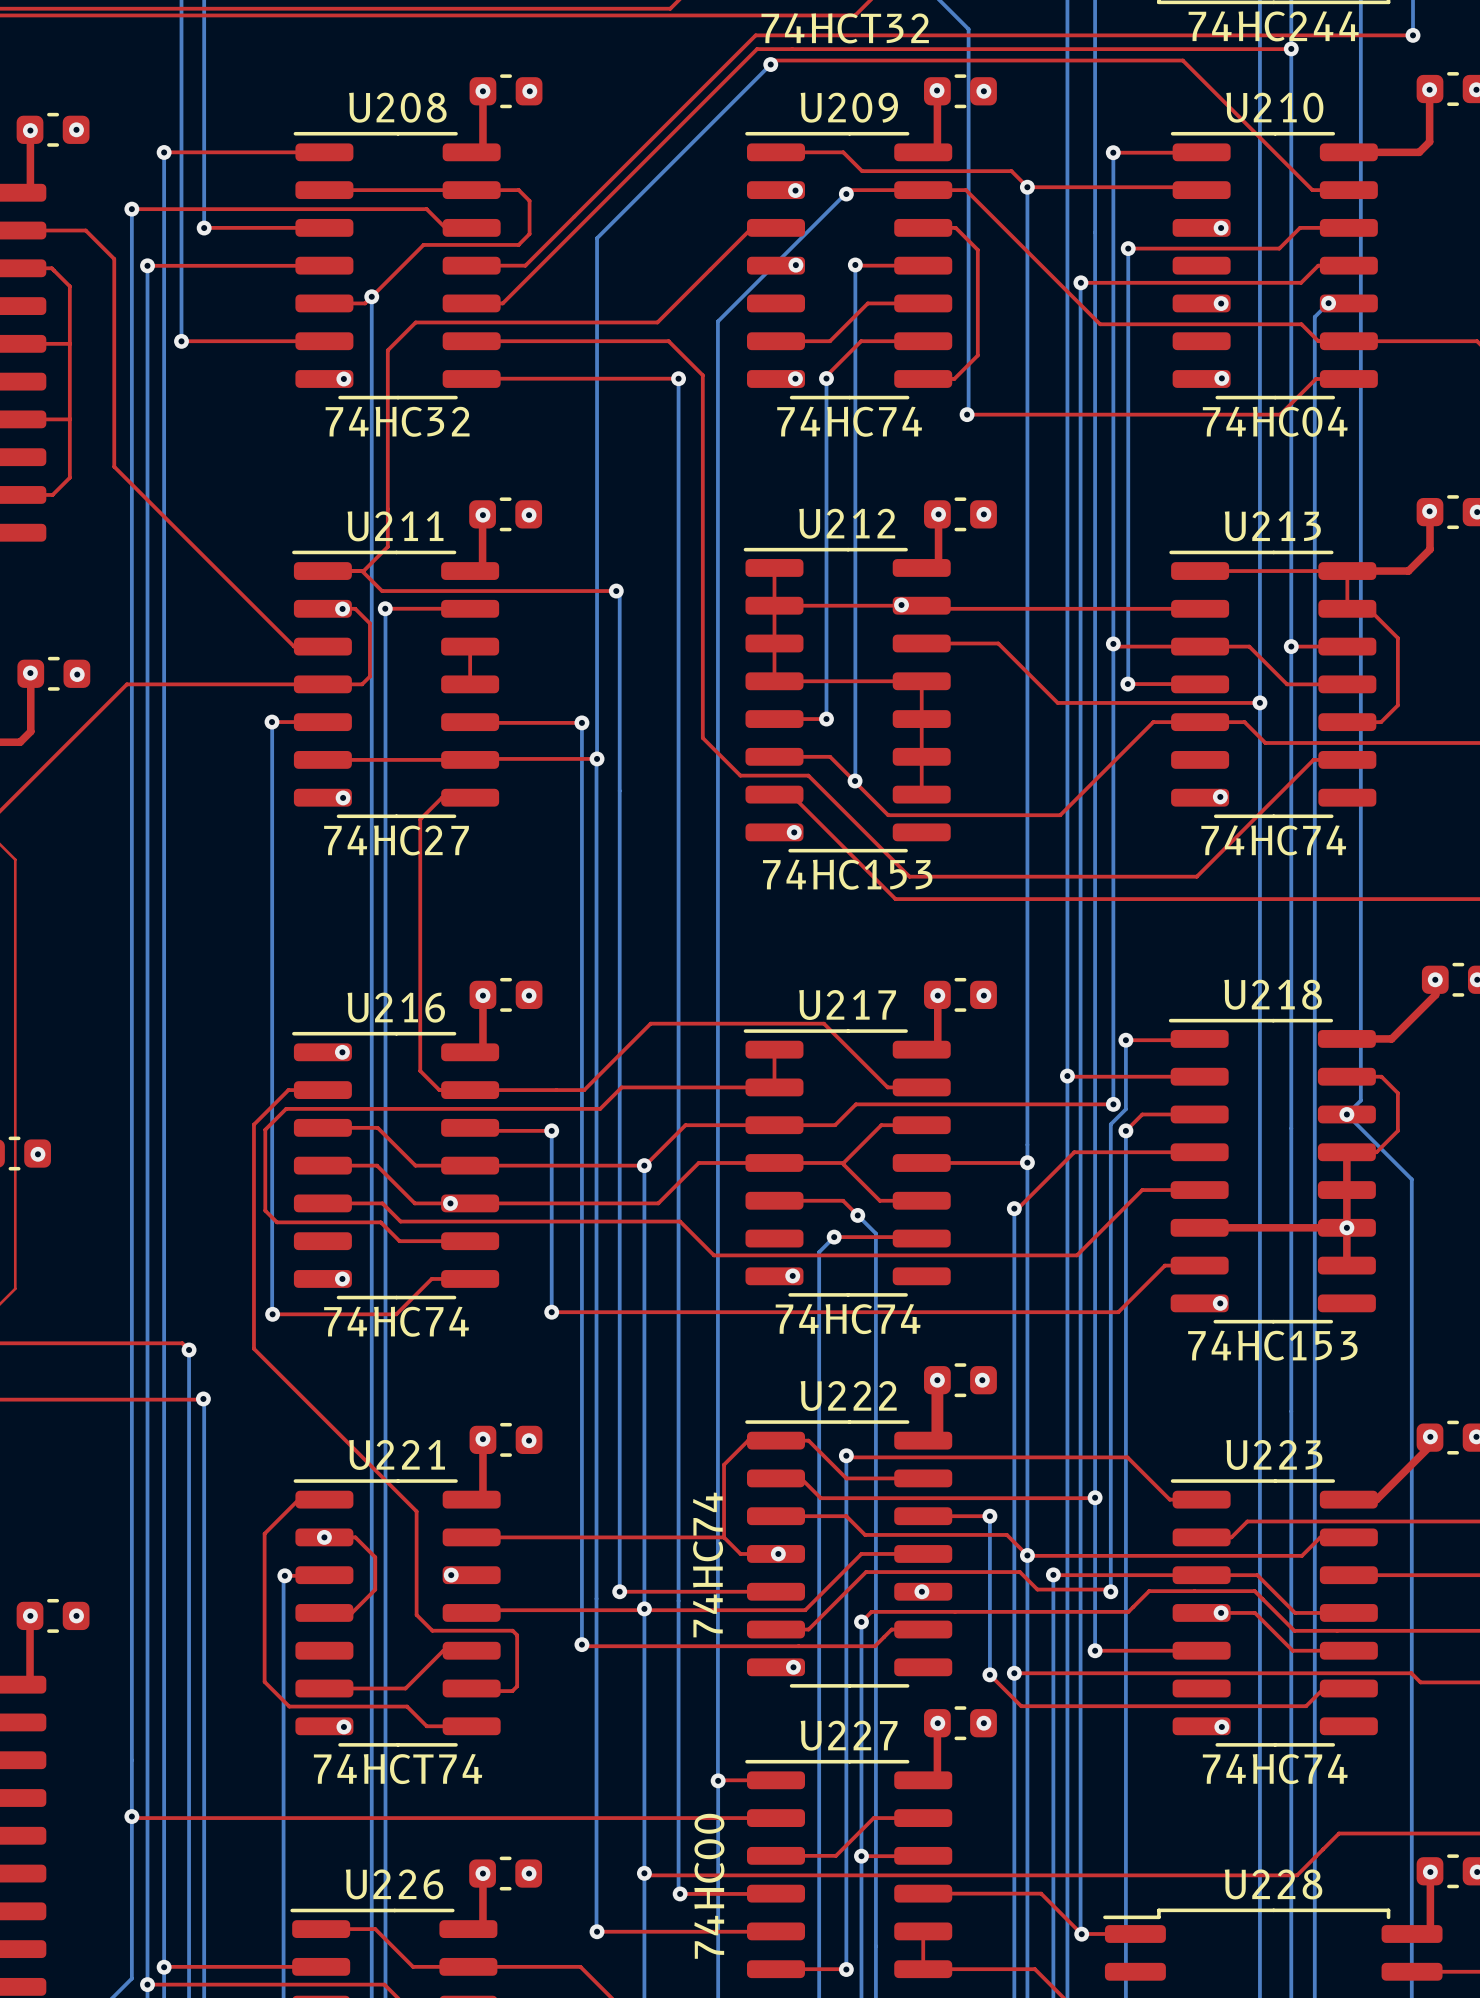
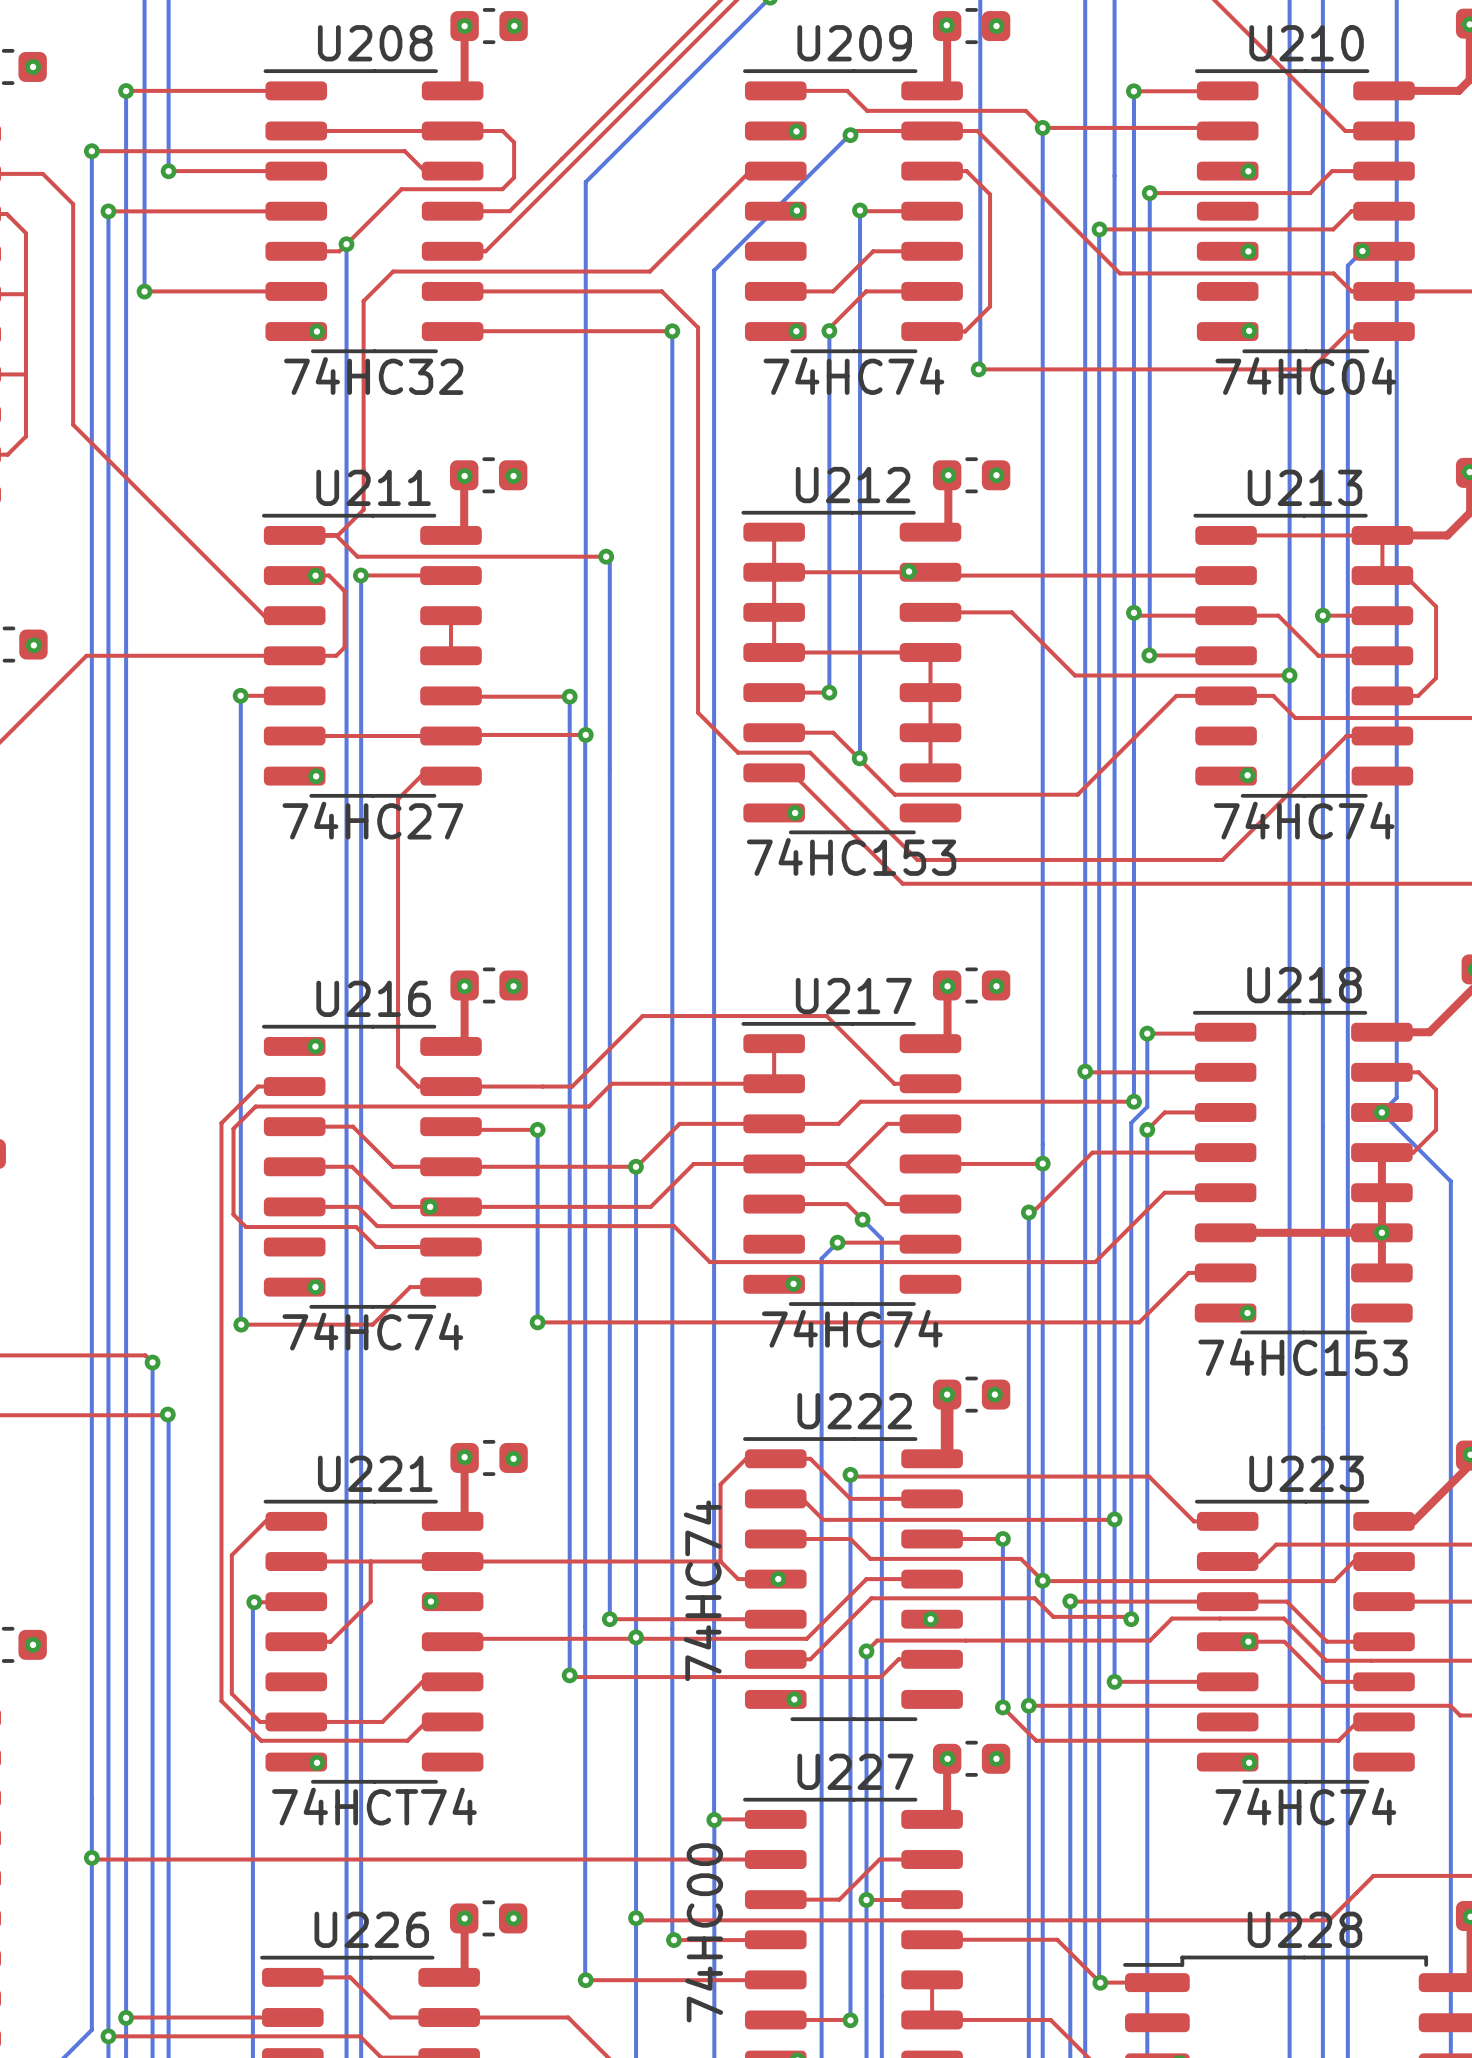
top track: (253, 1348) (416, 1511) (416, 1614) (432, 1630) (512, 1630) (517, 1635) (517, 1686) (512, 1691) (474, 1691) (471, 1688) -> (221, 1361) (221, 1701) (261, 1740) (407, 1740) (426, 1721) (452, 1721)
top track: (298, 1499) (264, 1533) (264, 1681) (289, 1706) (407, 1706) (426, 1726) (471, 1726) -> (269, 1521) (265, 1521) (231, 1555) (231, 1693) (260, 1721) (296, 1721)
via: (324, 1537) -> none
top track: (355, 1537) (375, 1557) (375, 1589) (351, 1612) -> (370, 1561) (370, 1601) (330, 1641) (325, 1641)
top track: none -> (329, 1561) (452, 1561)

